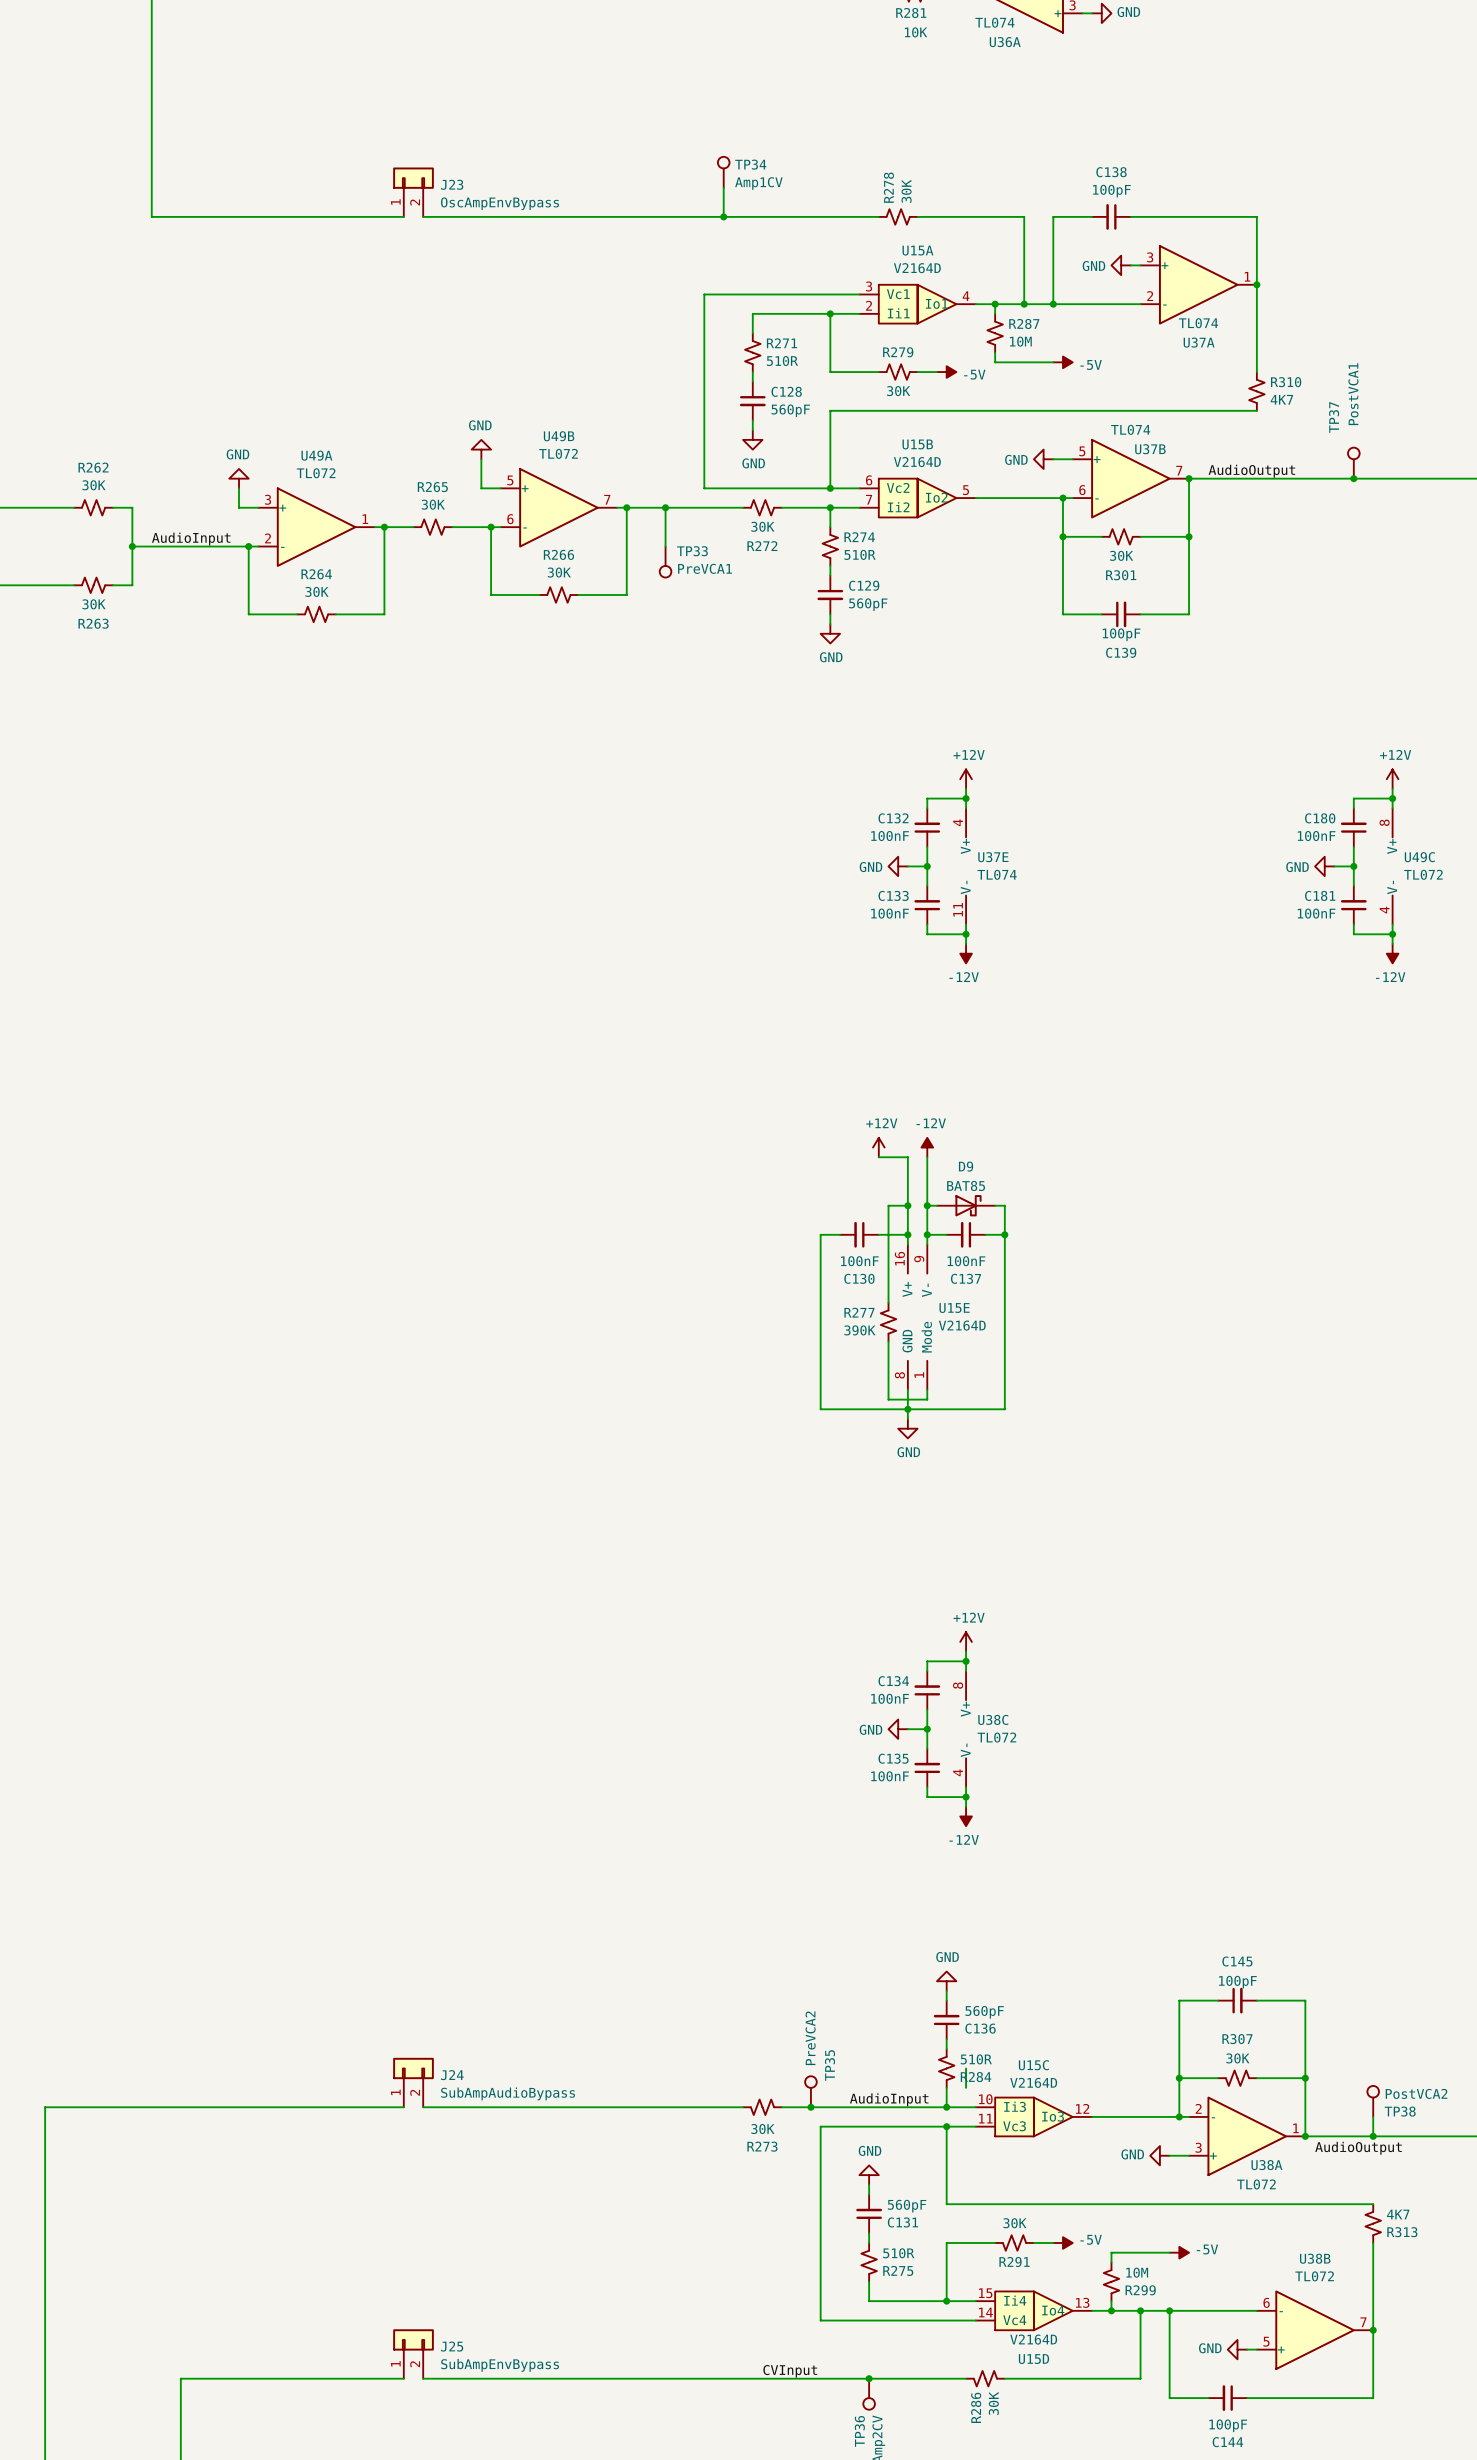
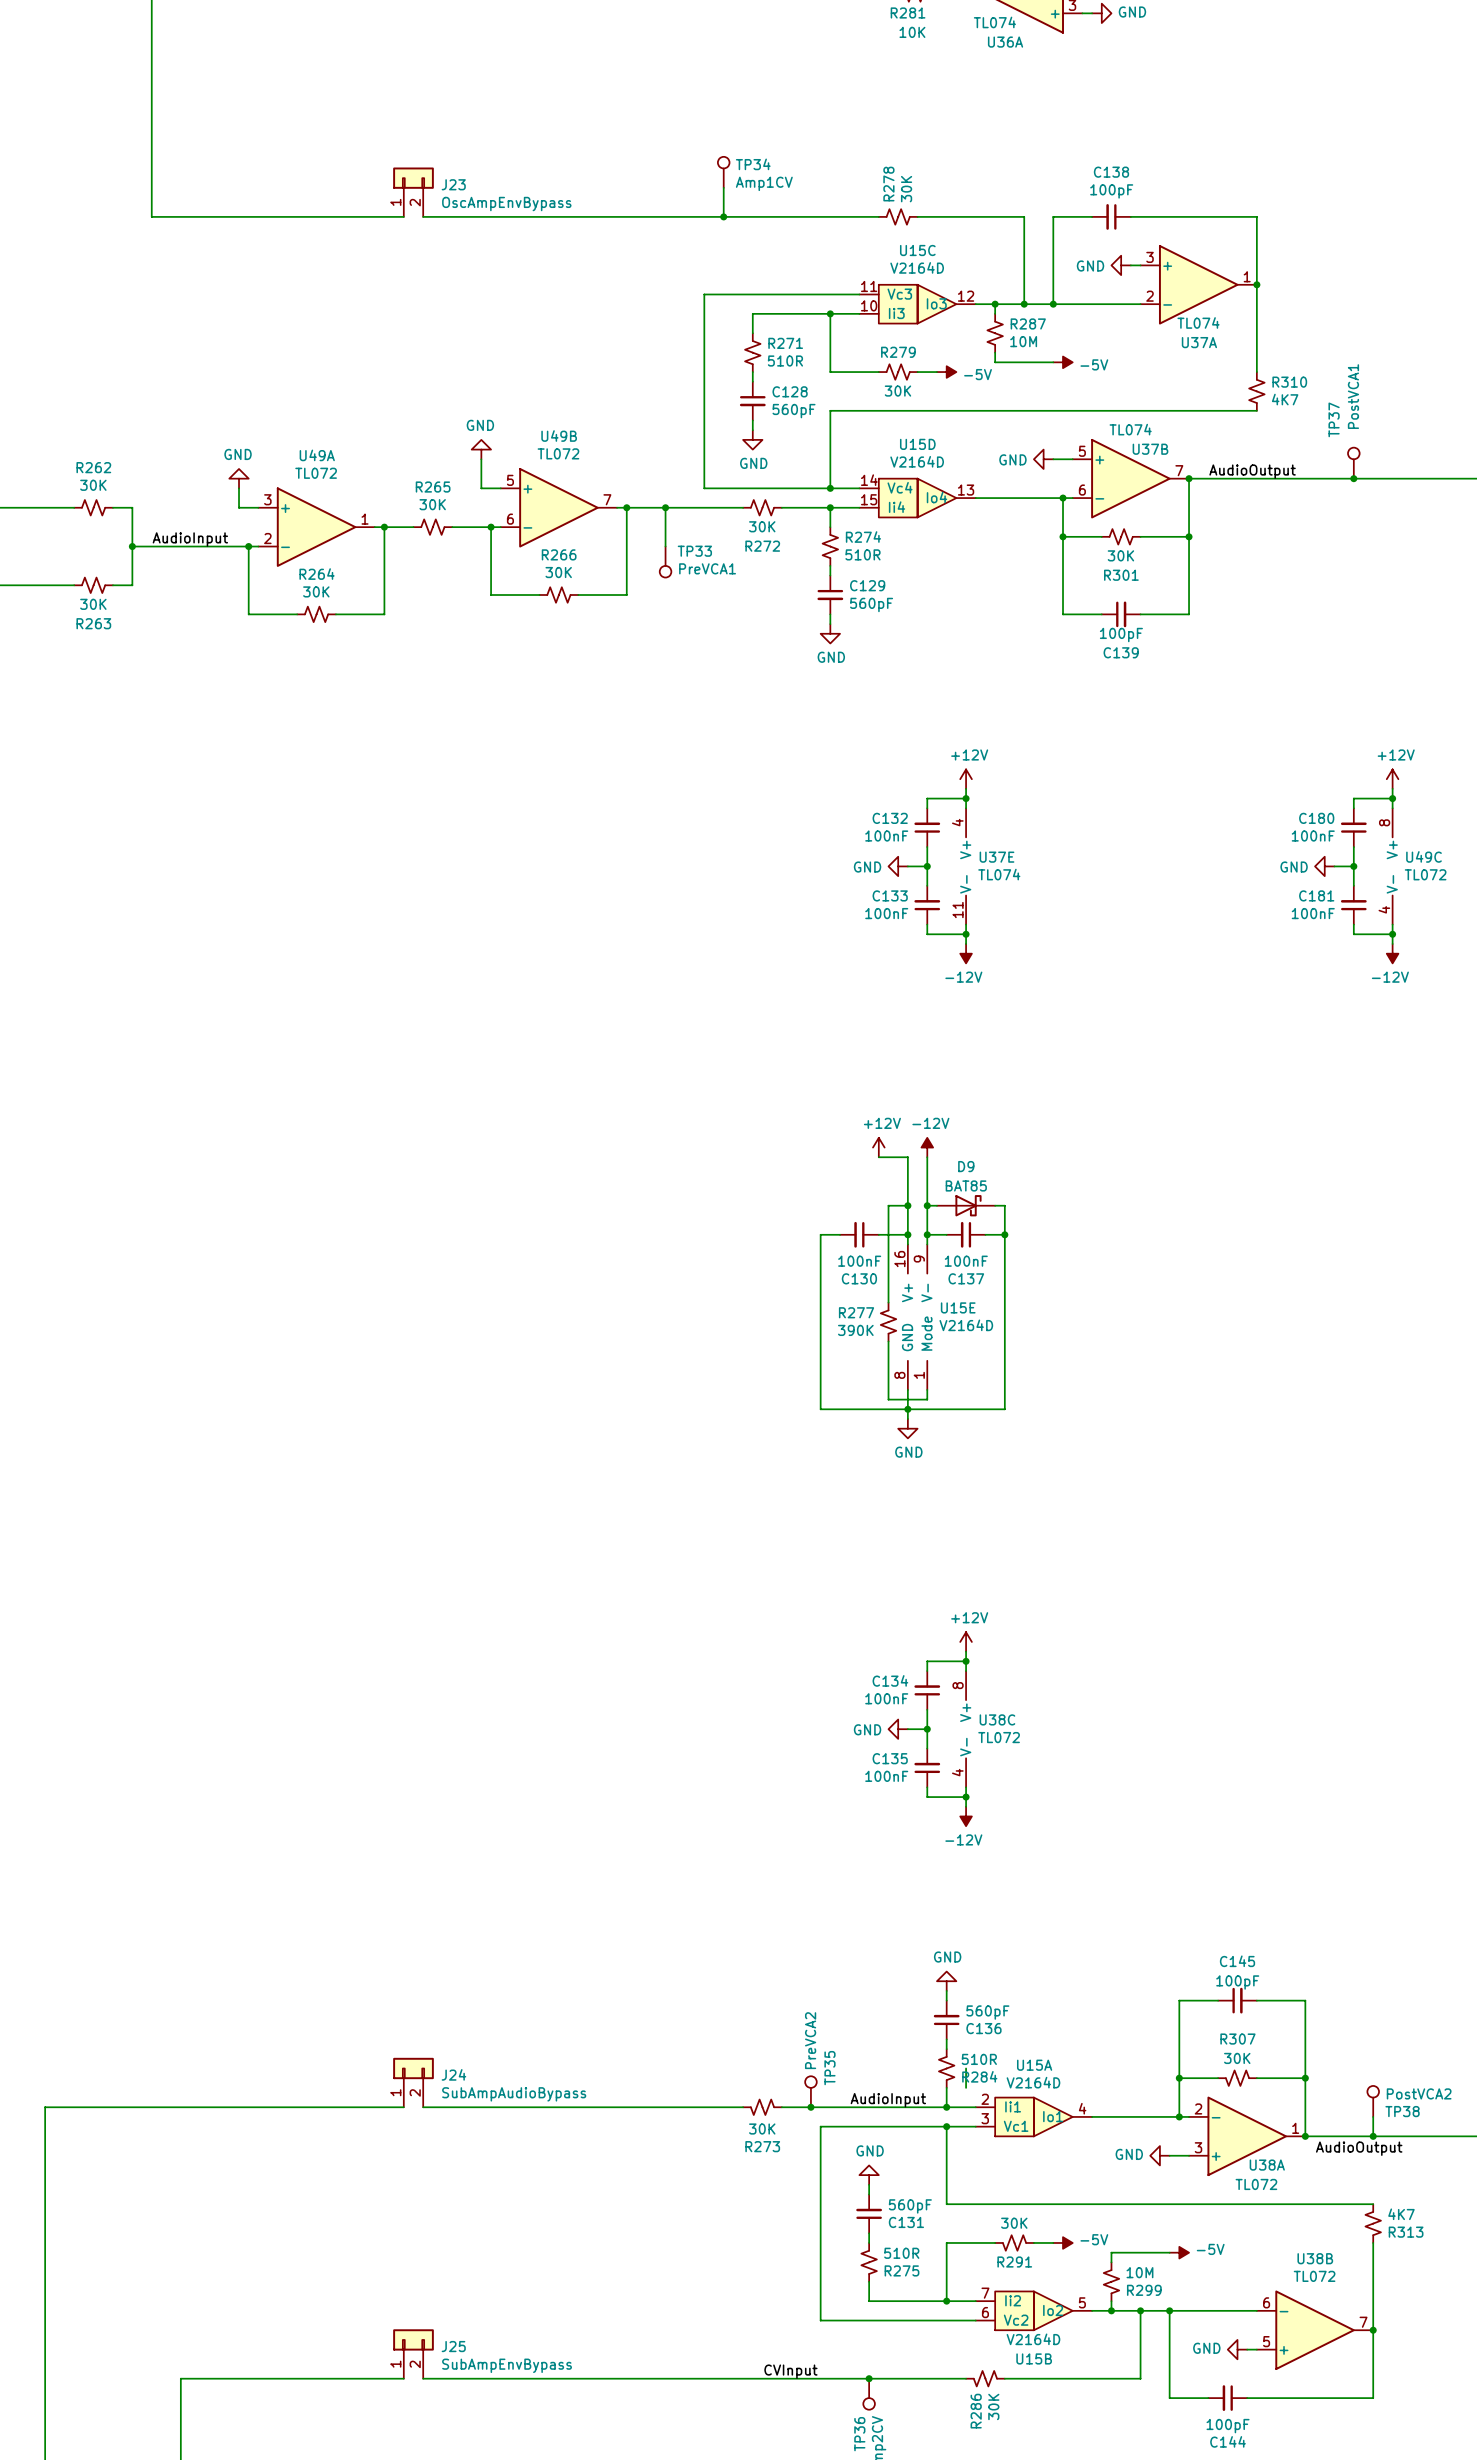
U15A flip: as is (917, 304) -> up-down (1033, 2116)
U15A position: (917, 304) -> (1033, 2116)
U15B flip: as is (917, 498) -> up-down (1033, 2310)
U15B position: (917, 498) -> (1033, 2310)
U15C flip: as is (1033, 2116) -> up-down (917, 304)
U15C position: (1033, 2116) -> (917, 304)
U15D flip: as is (1033, 2310) -> up-down (917, 498)
U15D position: (1033, 2310) -> (917, 498)

